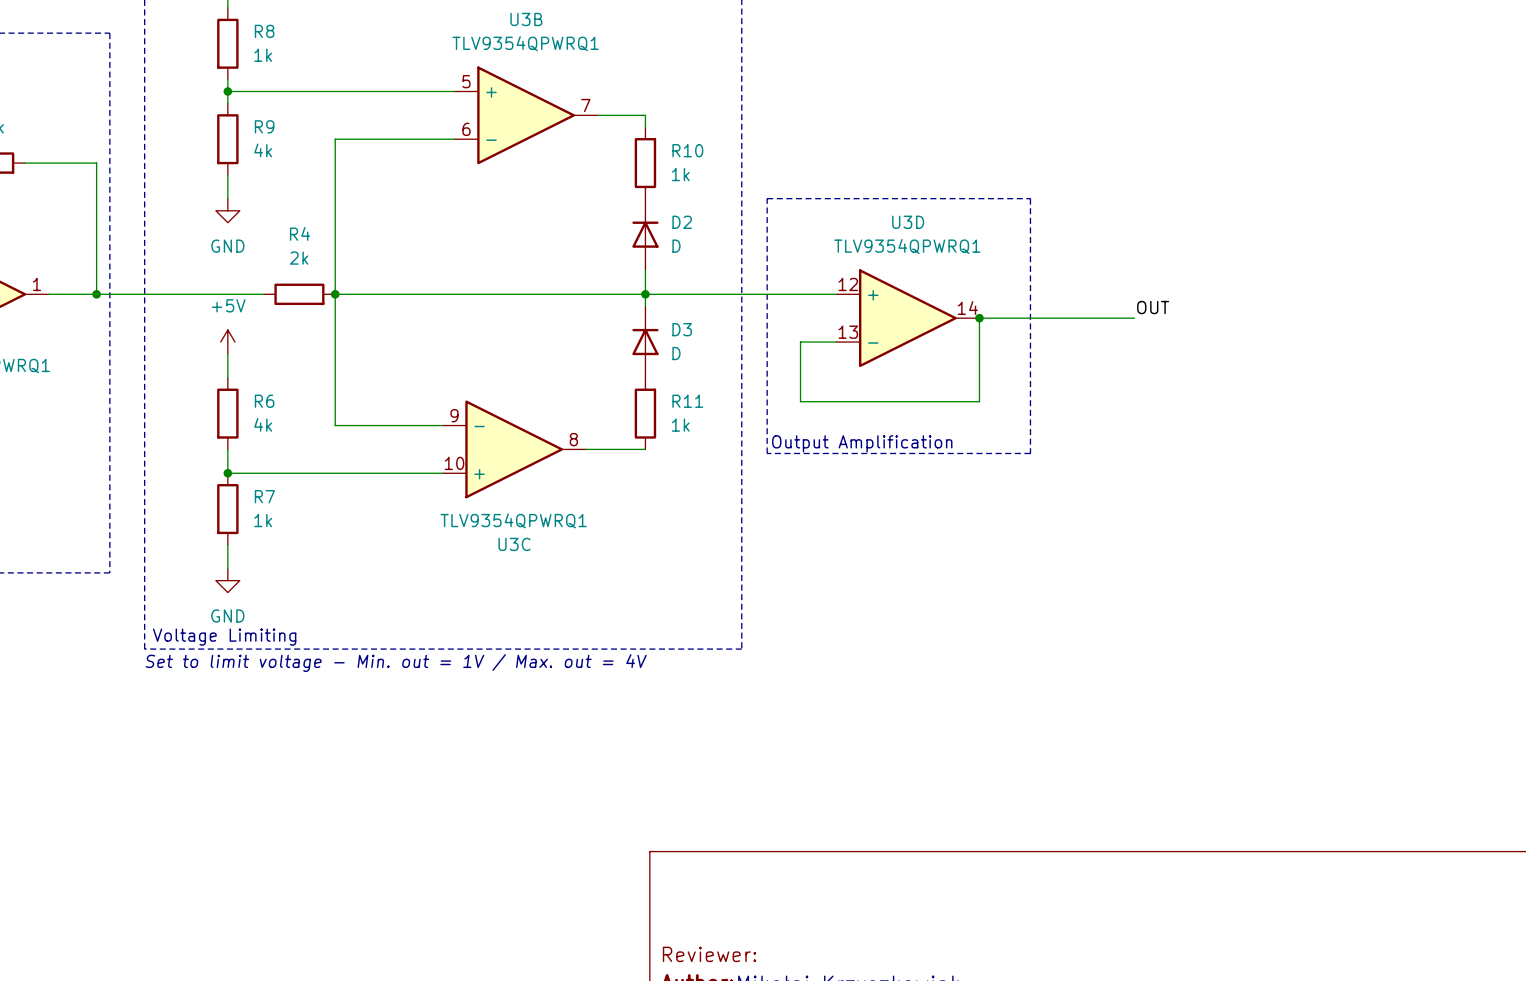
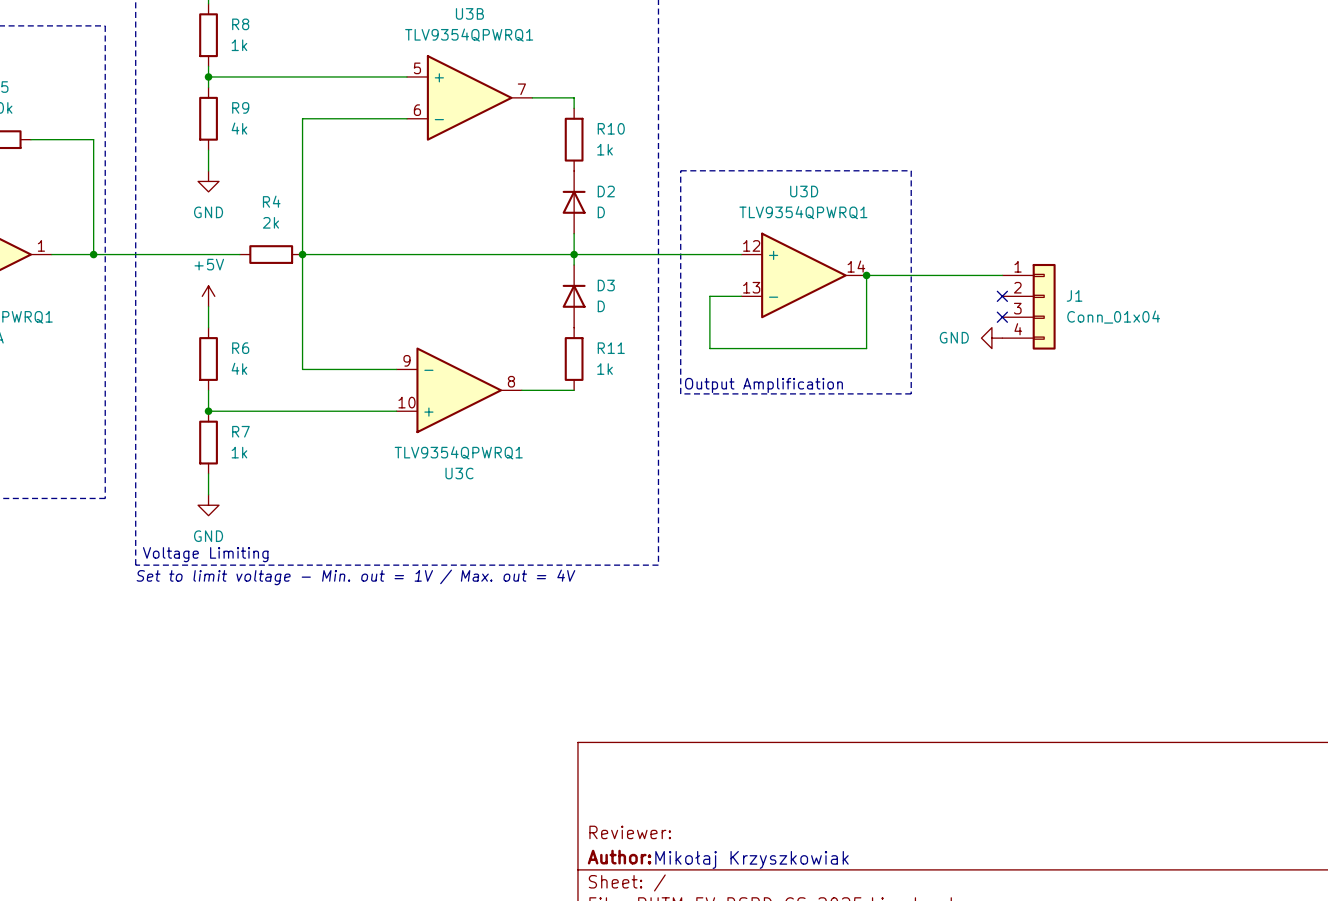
label: OUT (1153, 307) -> none
no-connect mark: none -> (1002, 296)
J1: none -> Conn_01x04 (1029, 306)
no-connect mark: none -> (1002, 317)
power symbol: none -> GND (991, 338)

